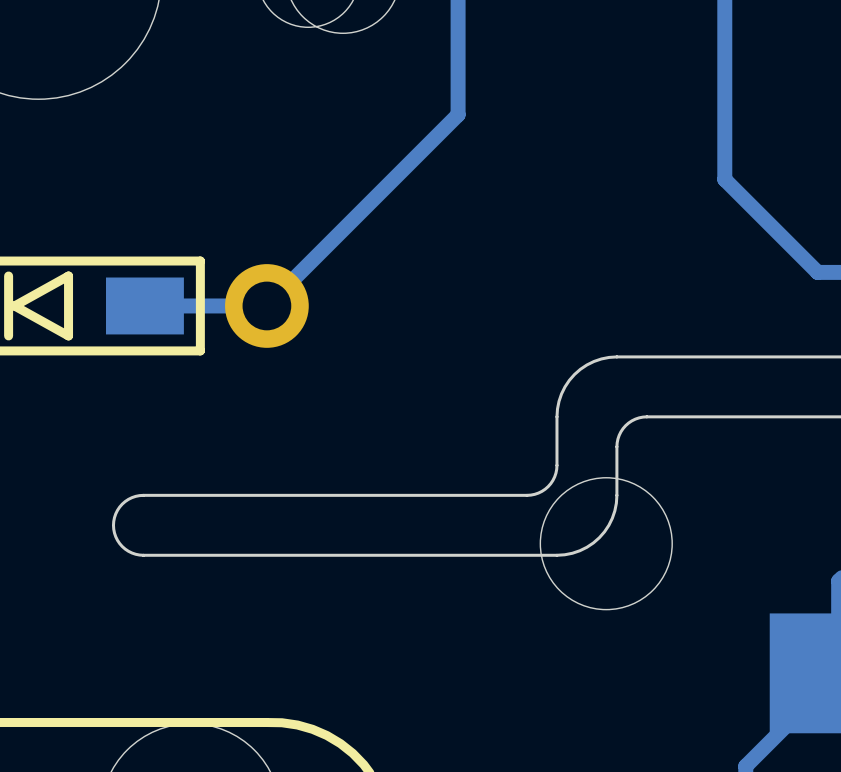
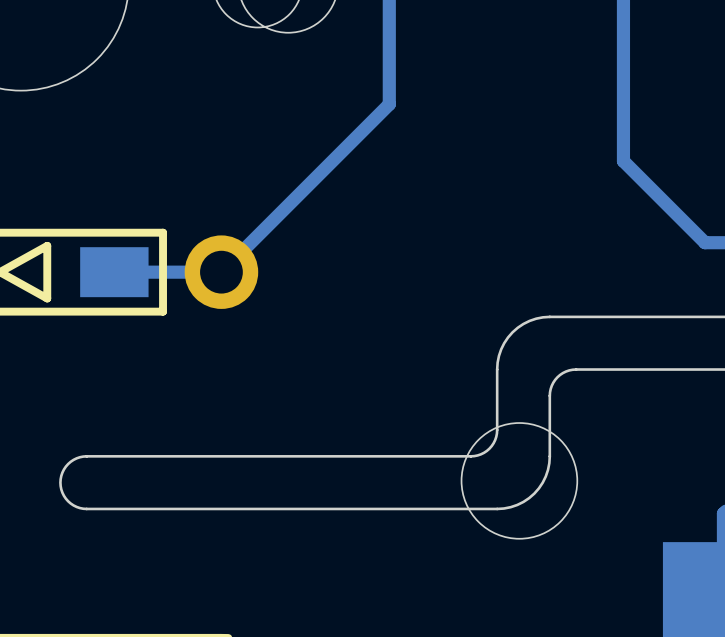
board edge: (640, 356) (601, 358) (586, 364) (569, 380) (561, 393) (557, 409) (555, 473) (548, 486) (534, 494) (139, 495) (128, 499) (119, 507) (114, 517) (114, 533) (119, 543) (125, 549) (131, 553) (143, 555) (556, 555) (572, 553) (586, 547) (599, 537) (612, 518) (616, 495) (617, 442) (623, 428) (631, 420) (639, 417) (670, 416) -> (549, 316) (536, 318) (523, 323) (512, 332) (504, 343) (497, 362) (496, 436) (489, 448) (480, 454) (470, 456) (83, 456) (70, 461) (63, 469) (60, 479) (62, 492) (70, 503) (86, 508) (497, 508) (510, 507) (523, 501) (534, 493) (545, 476) (549, 456) (550, 389) (560, 374) (576, 369)

